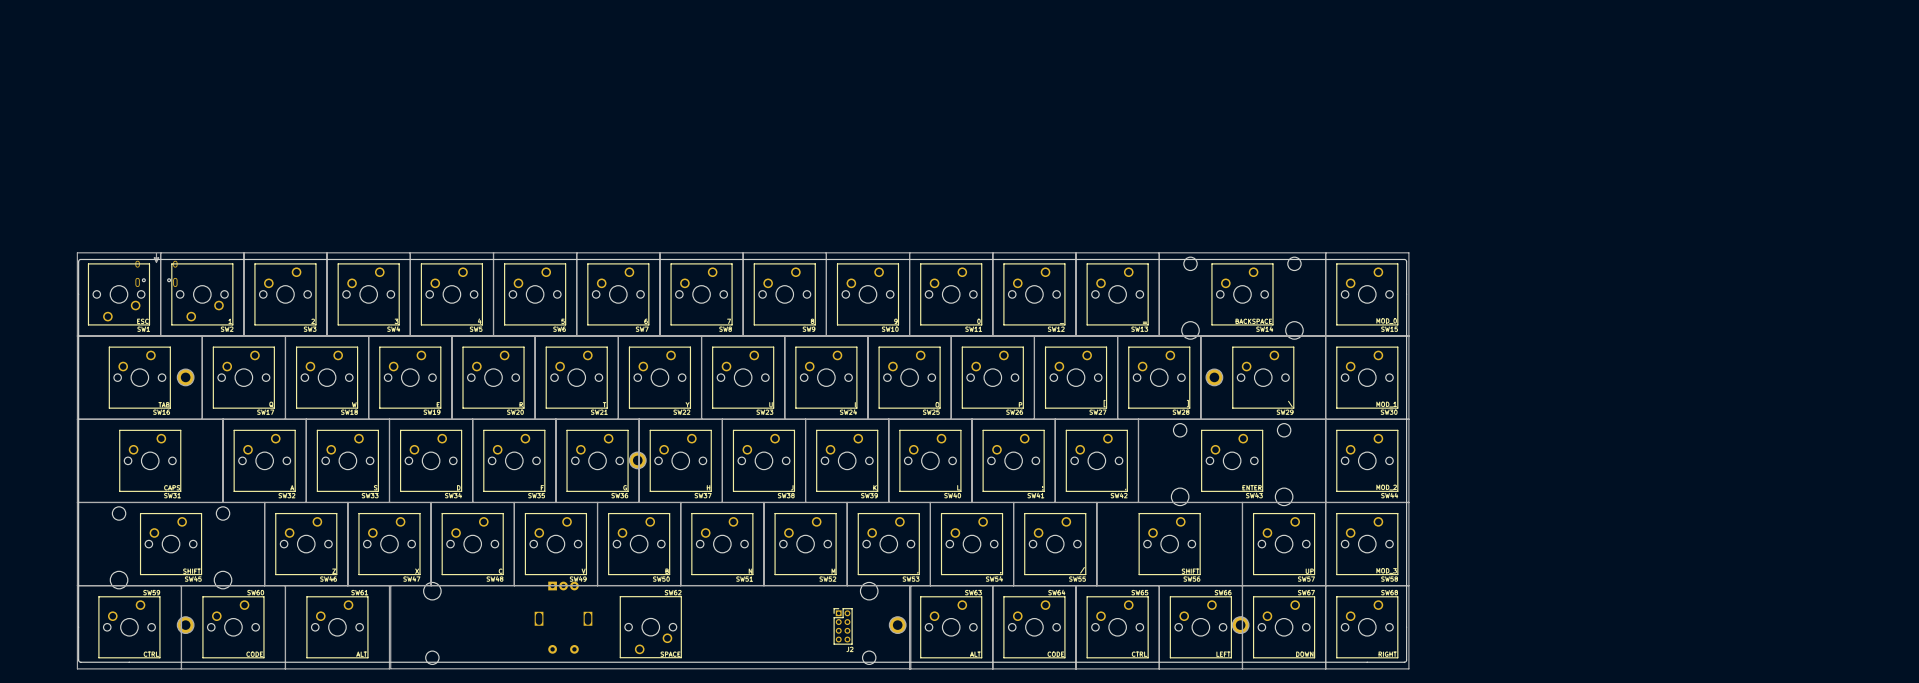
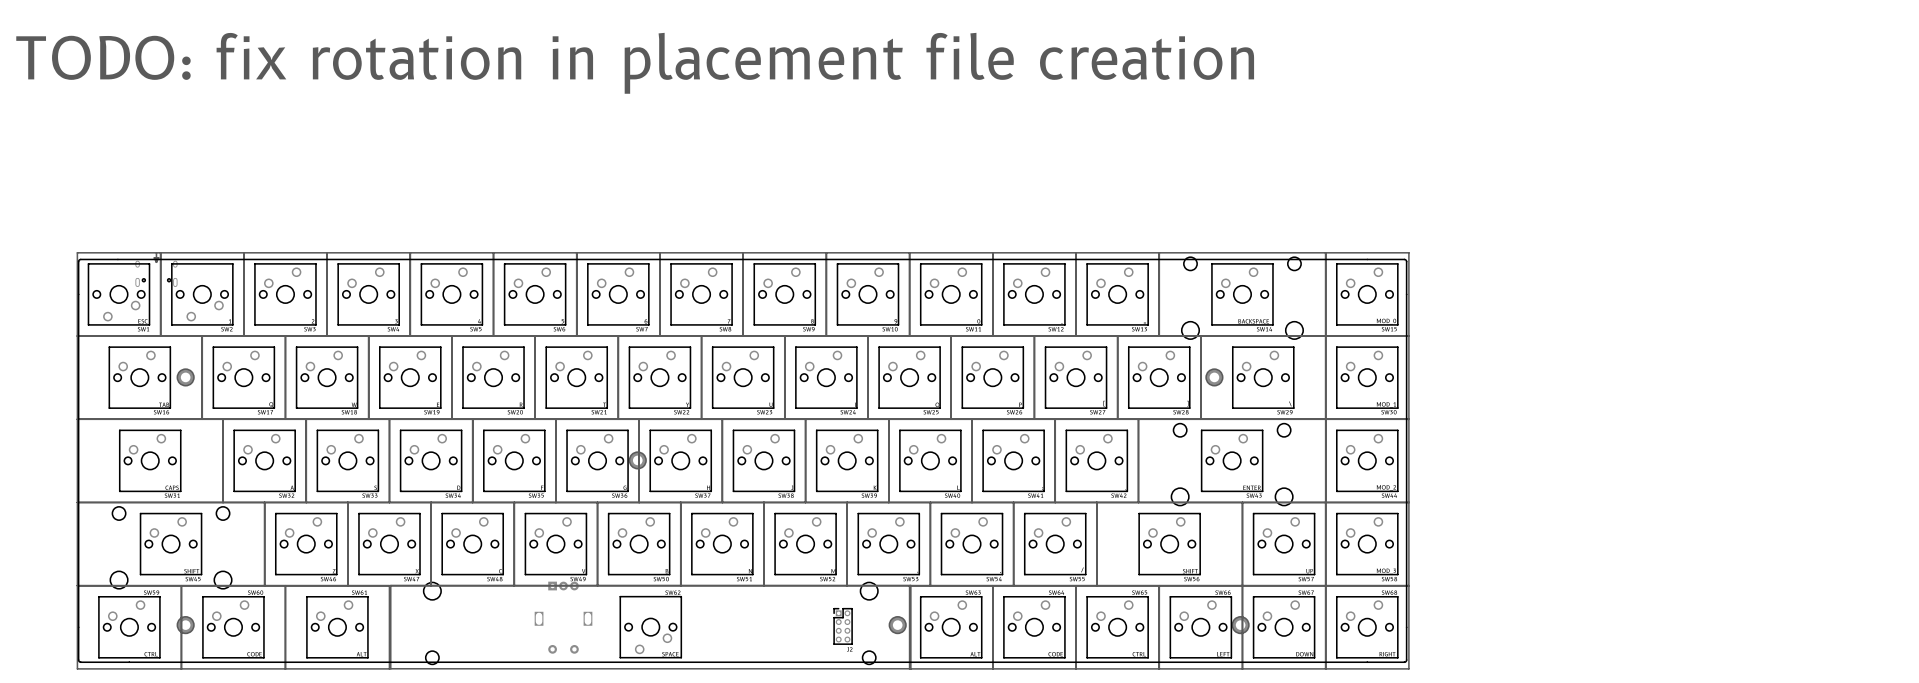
text: none -> TODO: fix rotation in placement file creation (635, 63)

